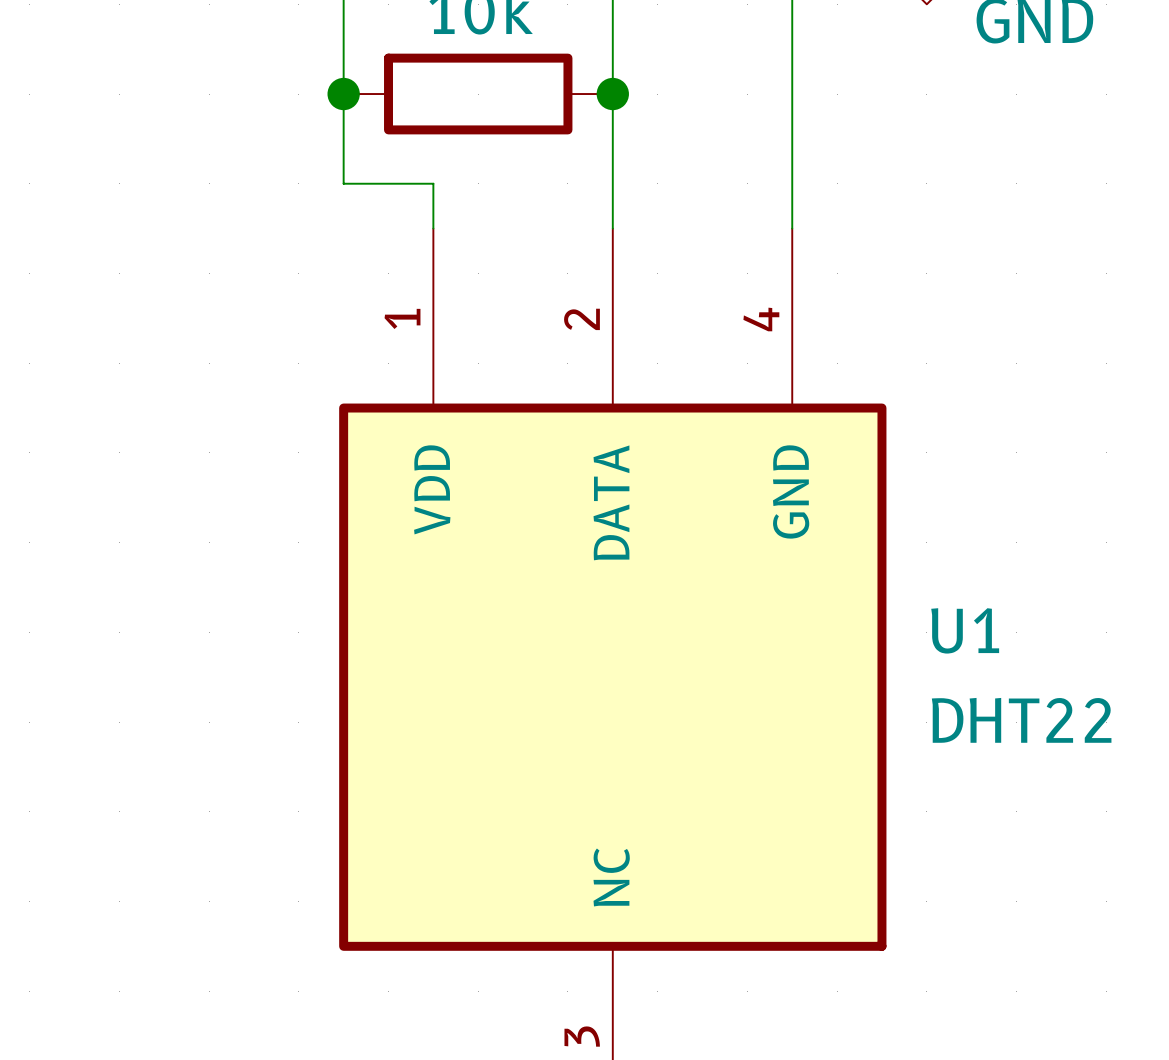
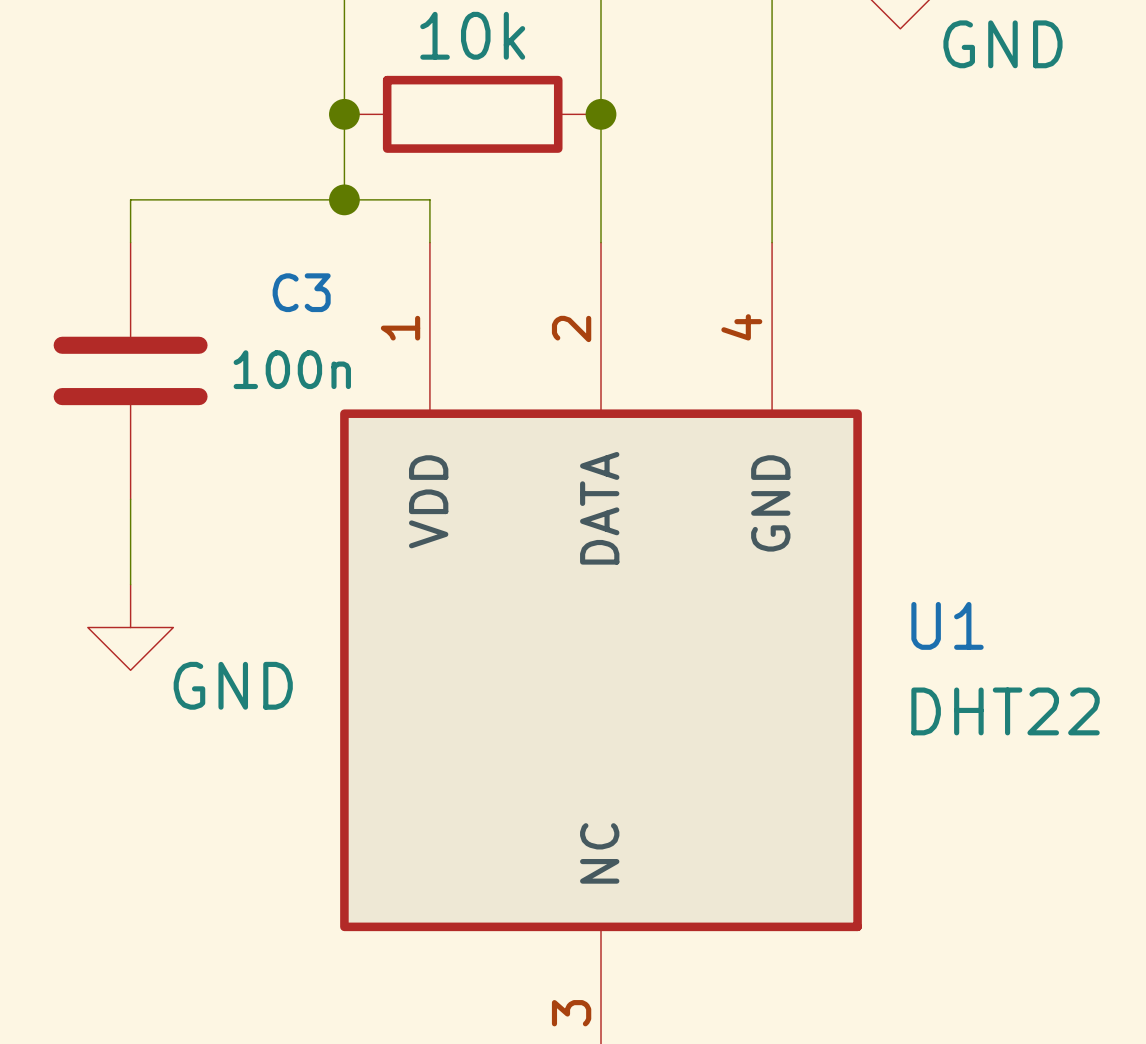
wire: none -> (344, 199) (130, 199) (130, 242)
junction: none -> (344, 199)
C3: none -> 100n (130, 370)
wire: none -> (130, 499) (130, 584)
power symbol: none -> GND (130, 627)

